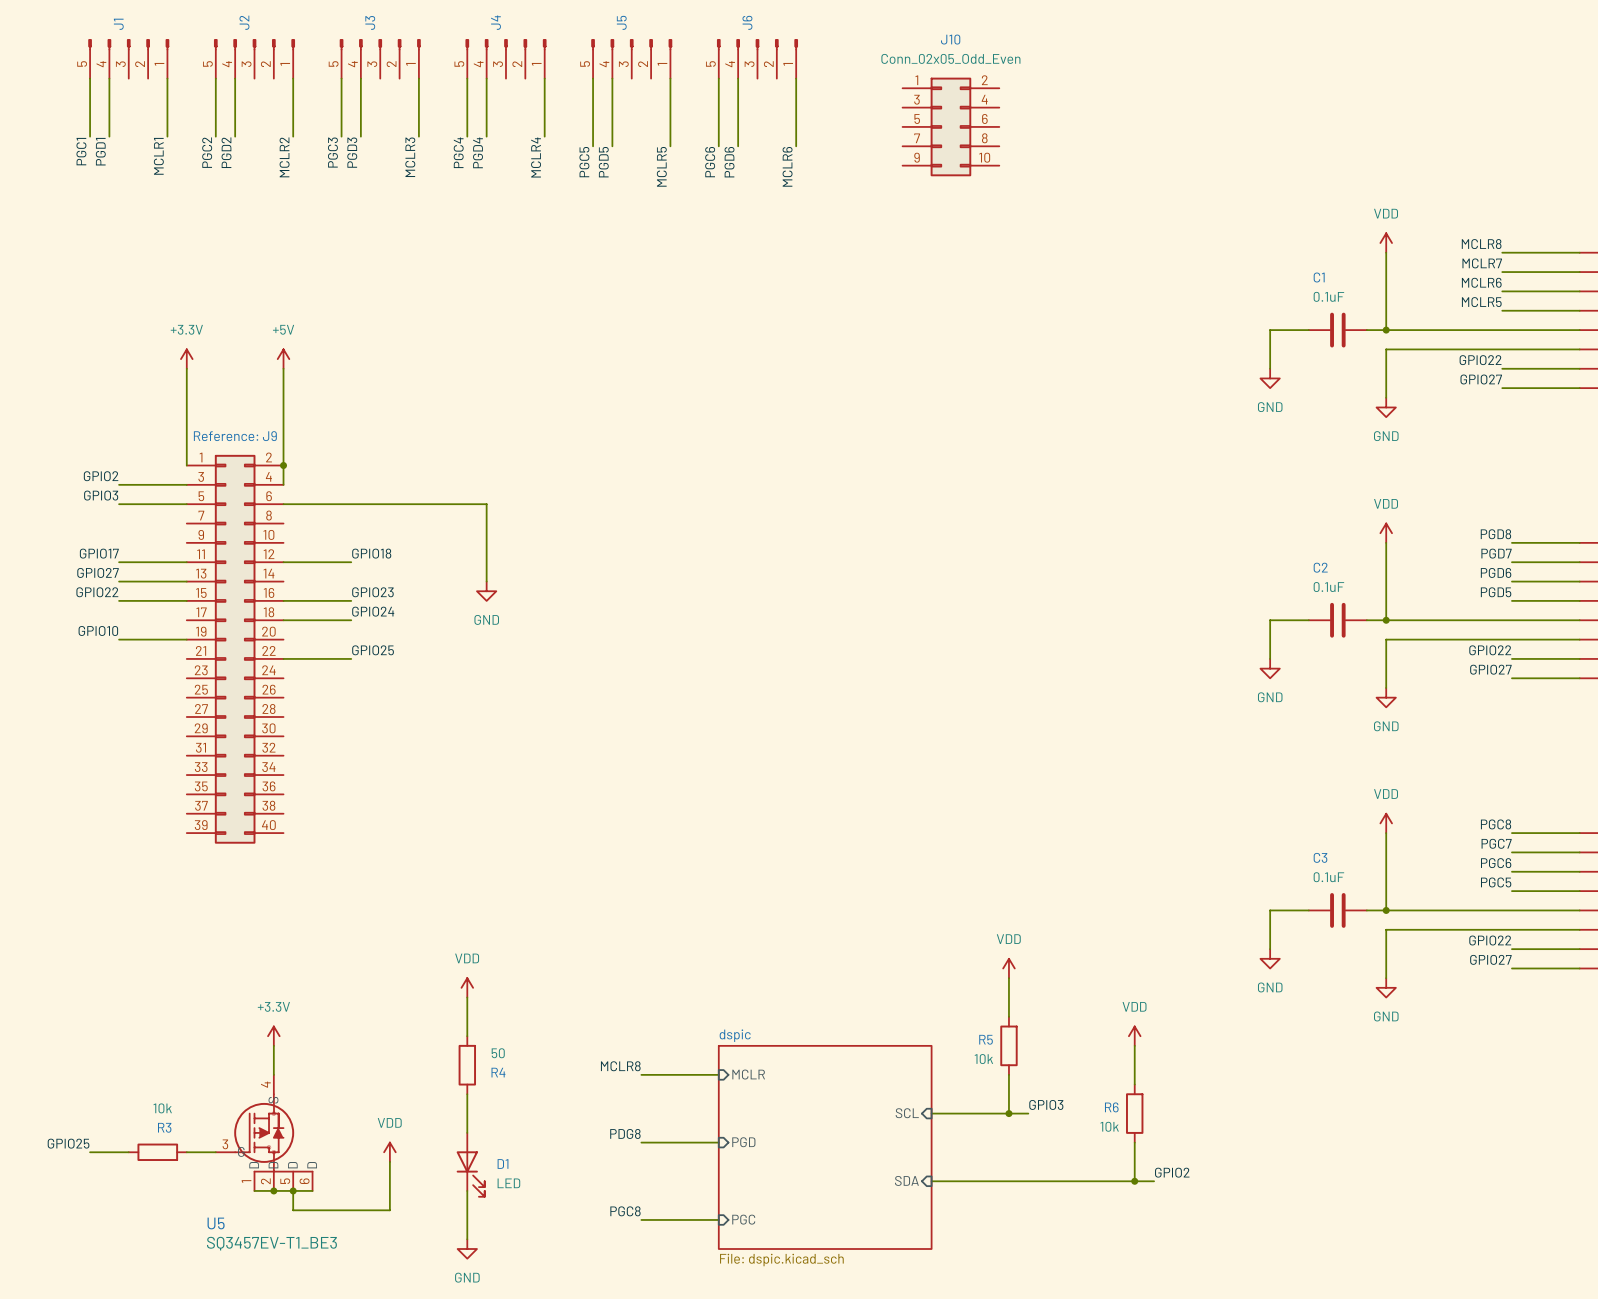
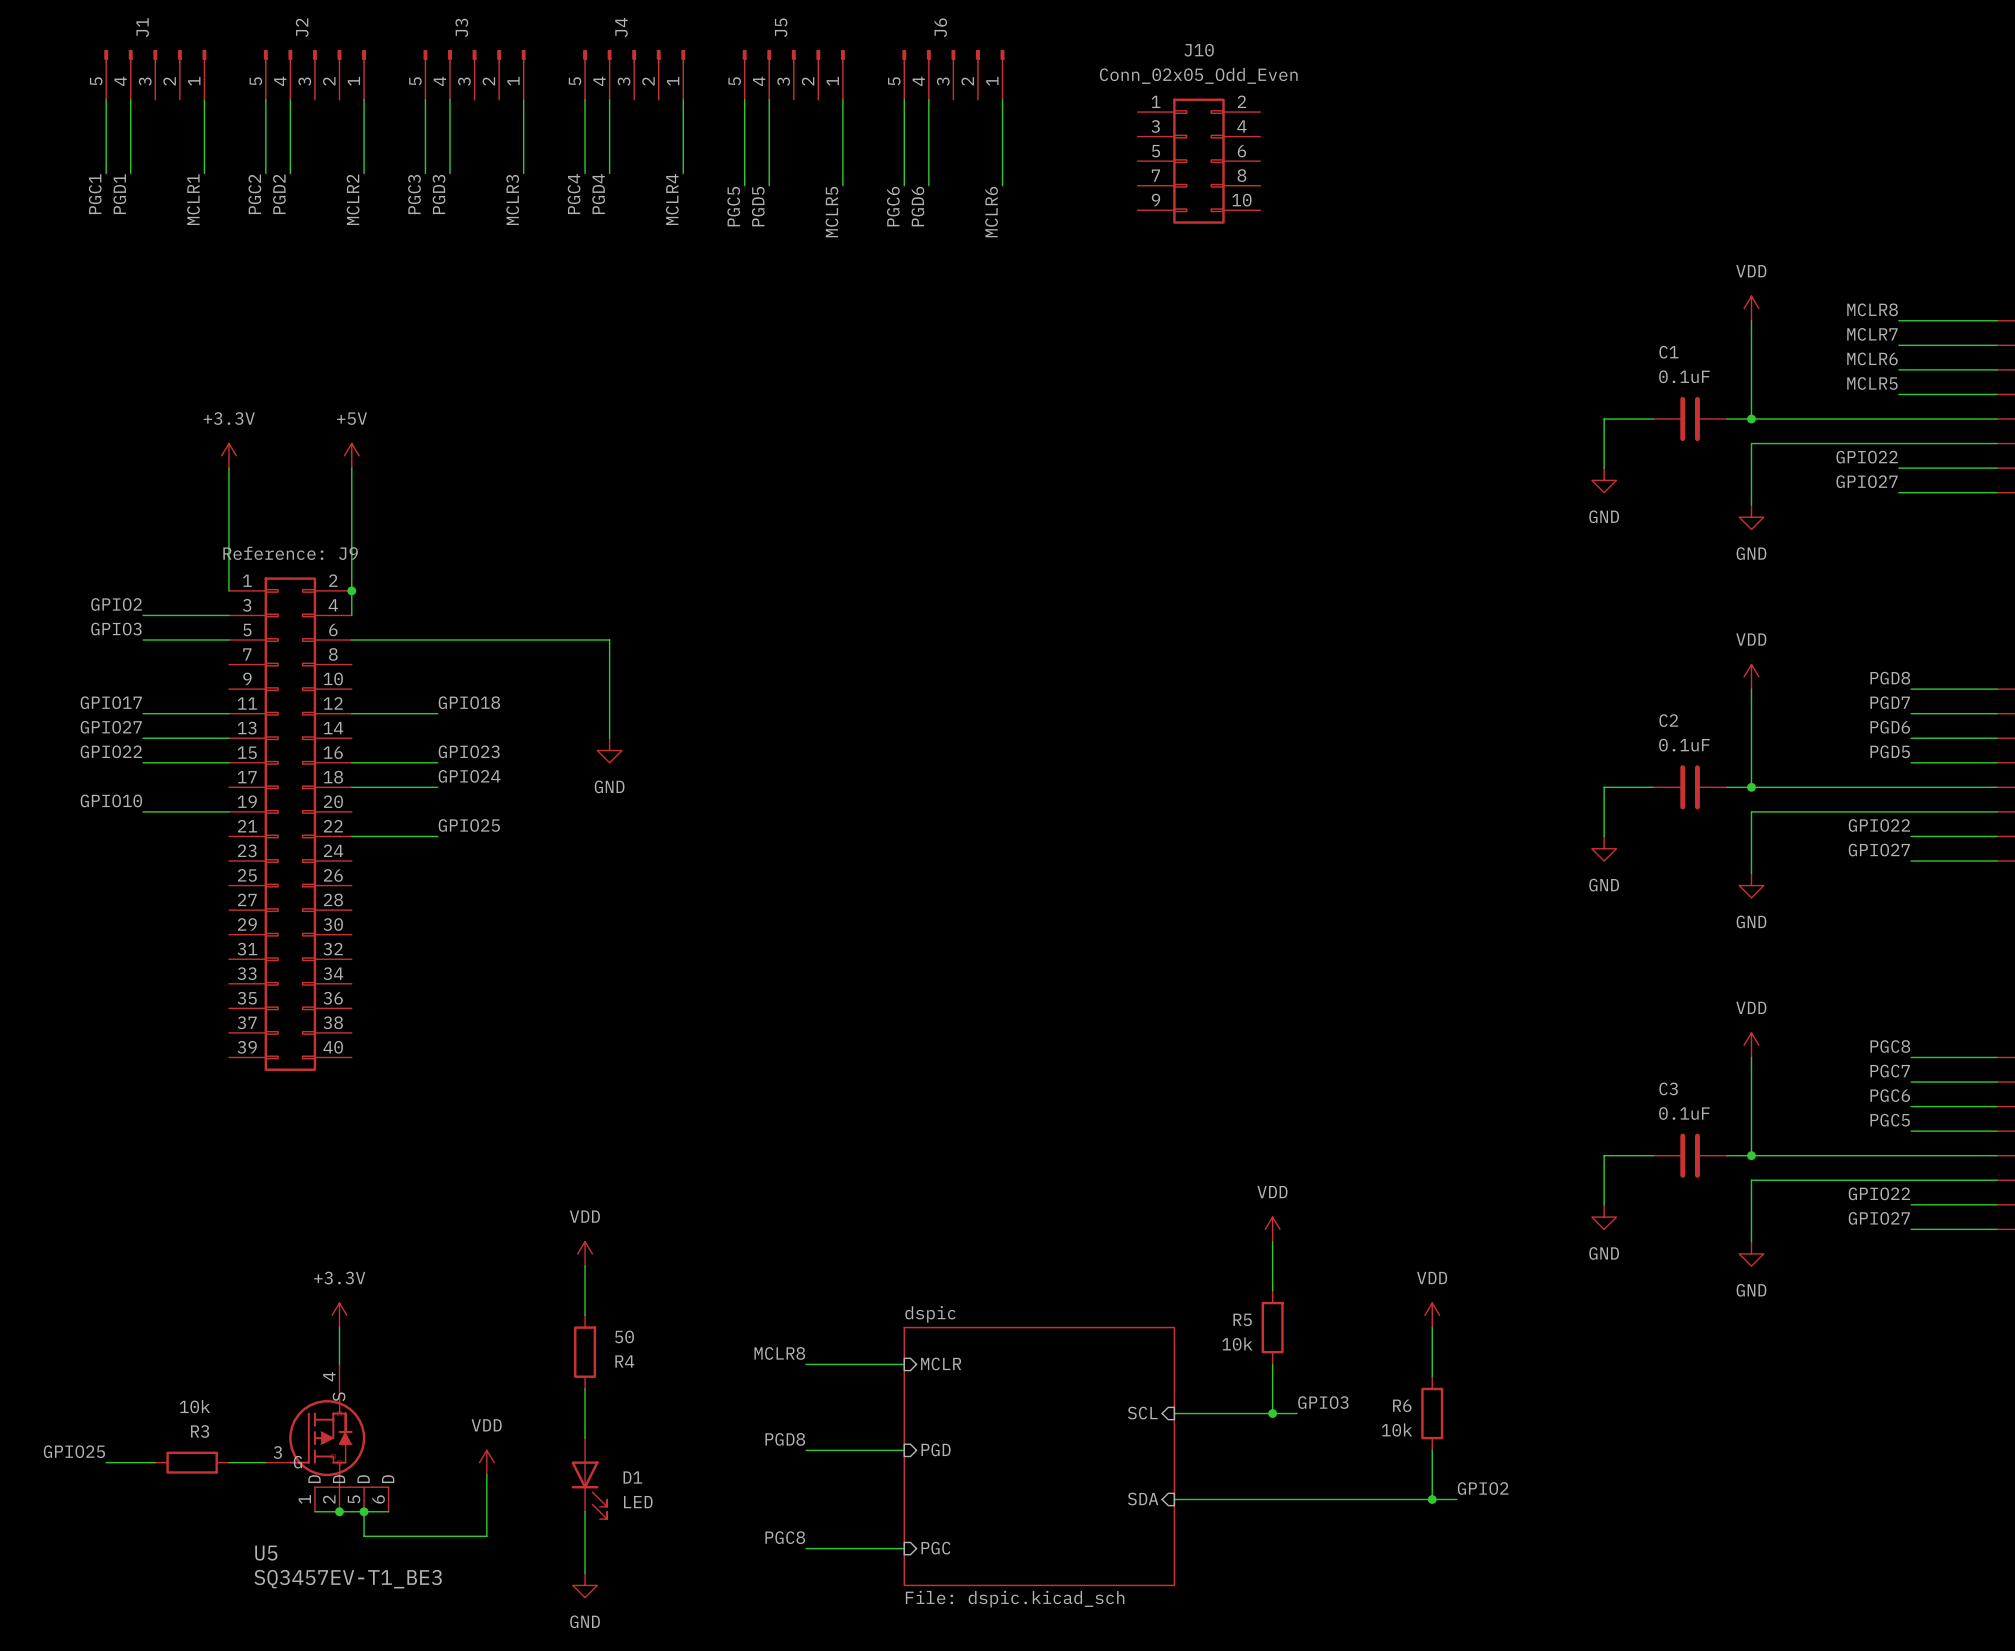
label: PDG8 (625, 1133) -> PGD8 (785, 1439)

